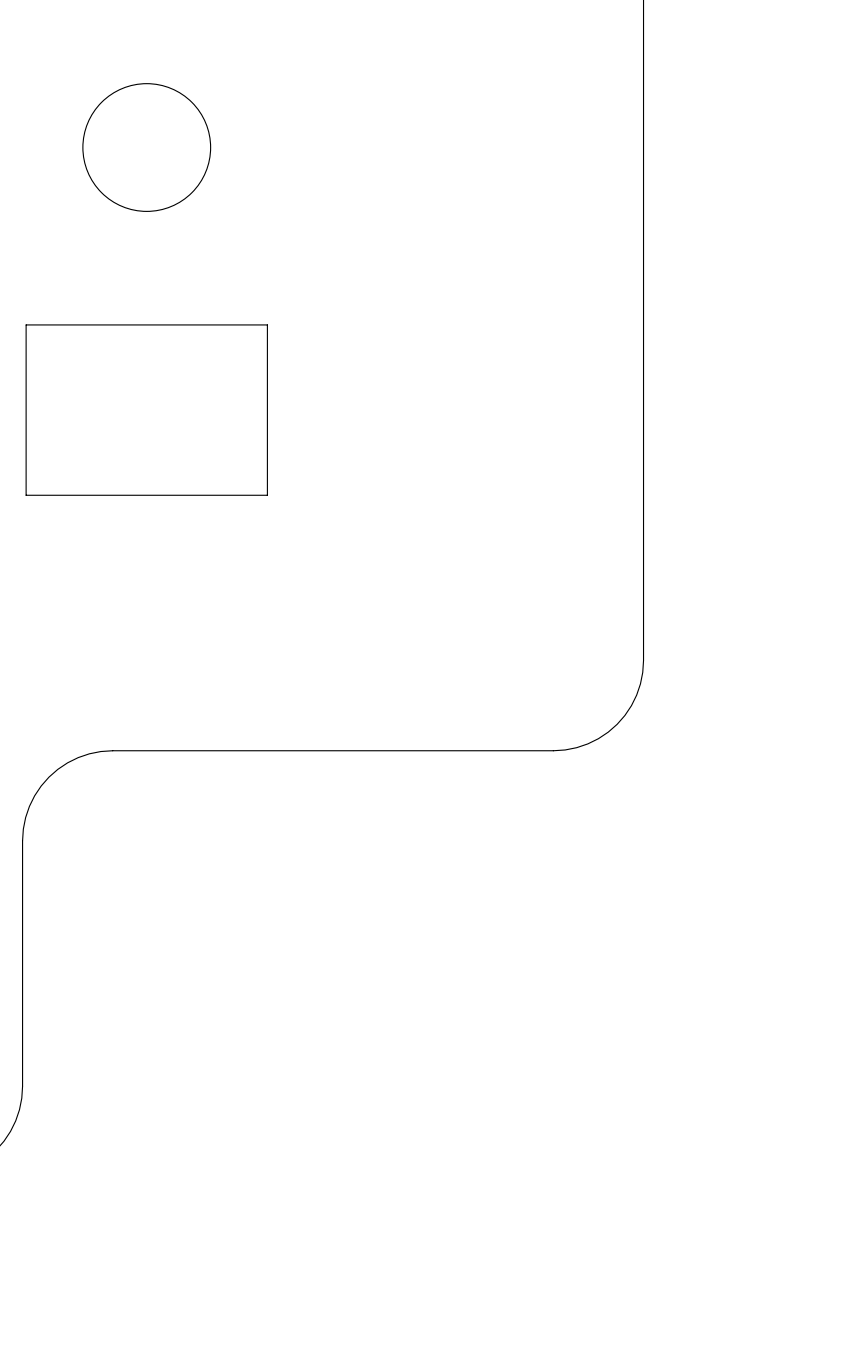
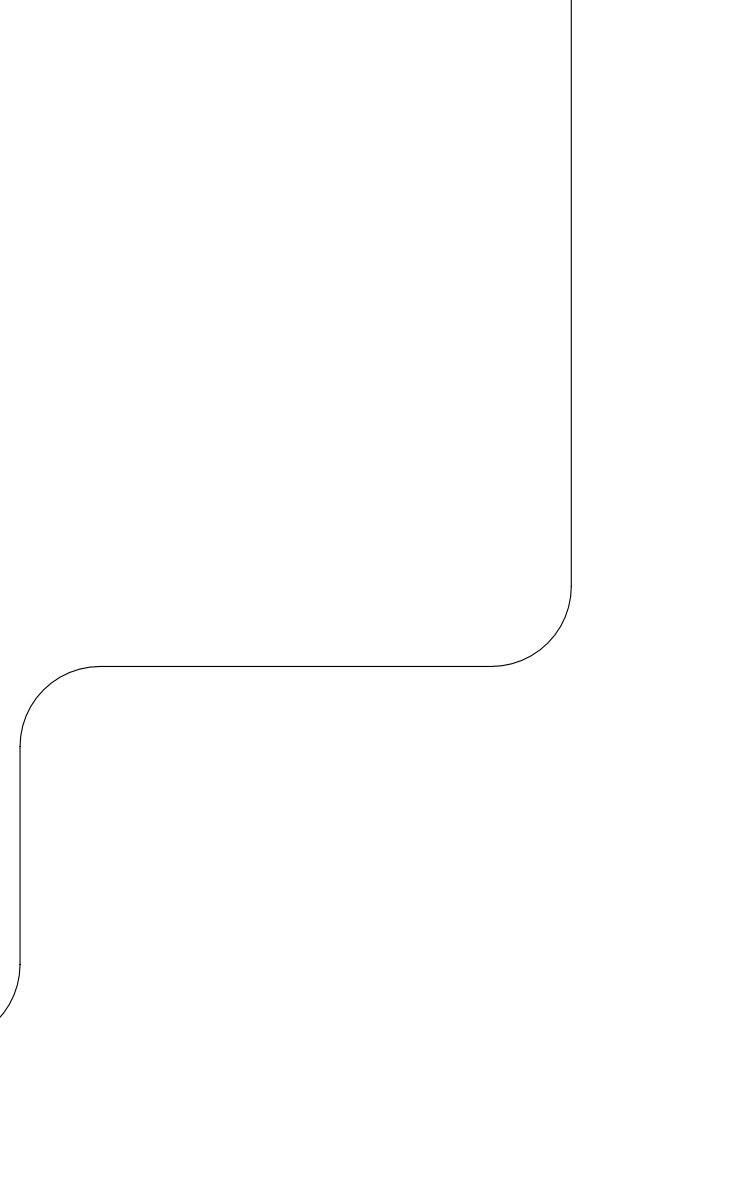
round board edge: [82, 83, 211, 212] -> none
board edge: (26, 324) (26, 495) (267, 495) (267, 324) (26, 324) -> none

